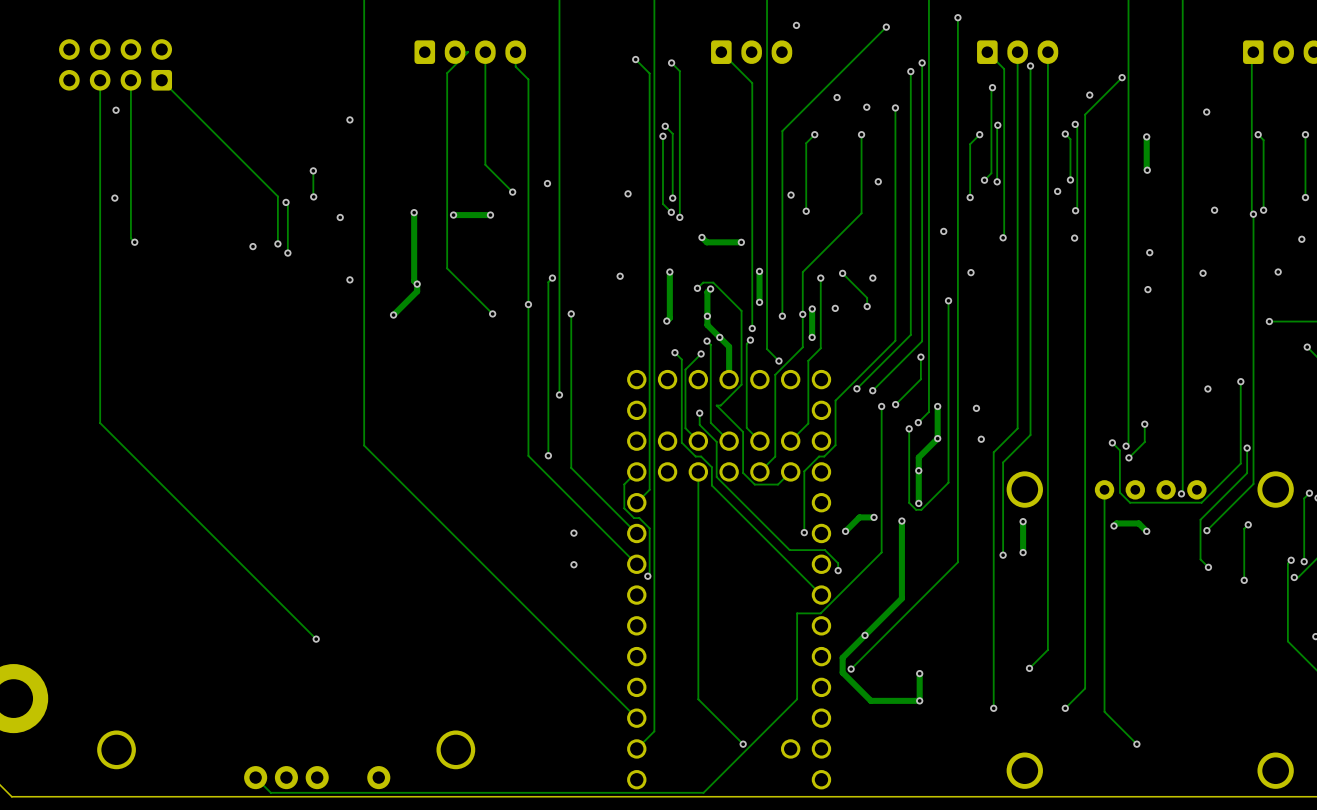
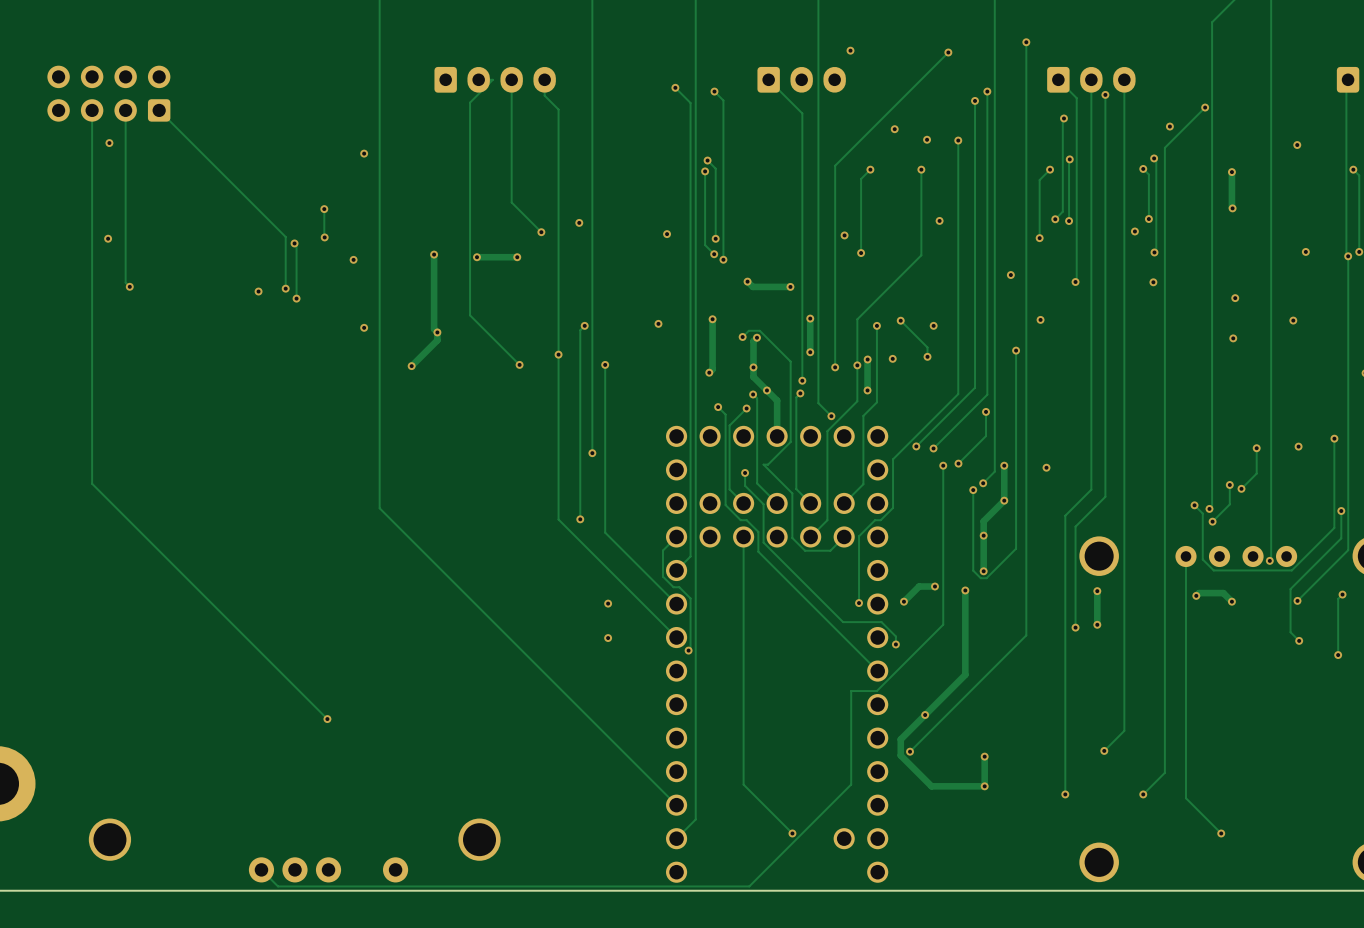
track: none -> (1256, 448) (1256, 473) (1241, 488)
via: none -> (1256, 448)
via: none -> (1241, 488)
via: (981, 439) -> none

